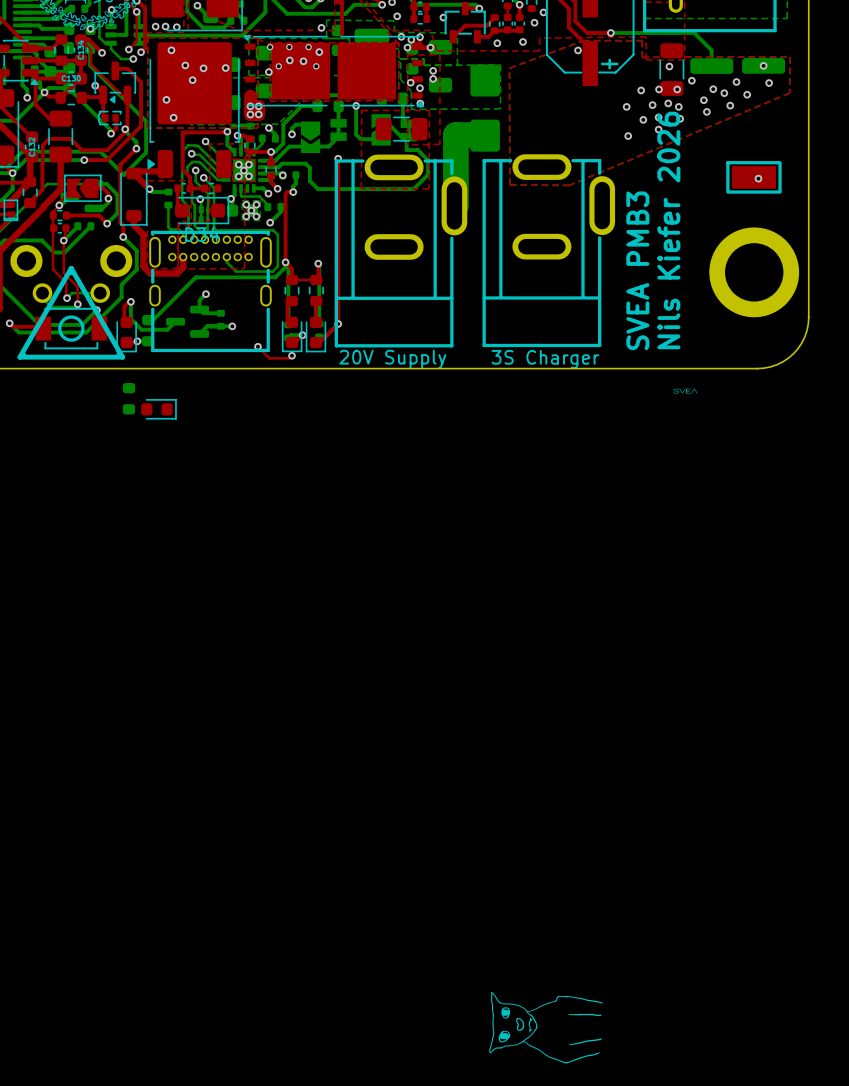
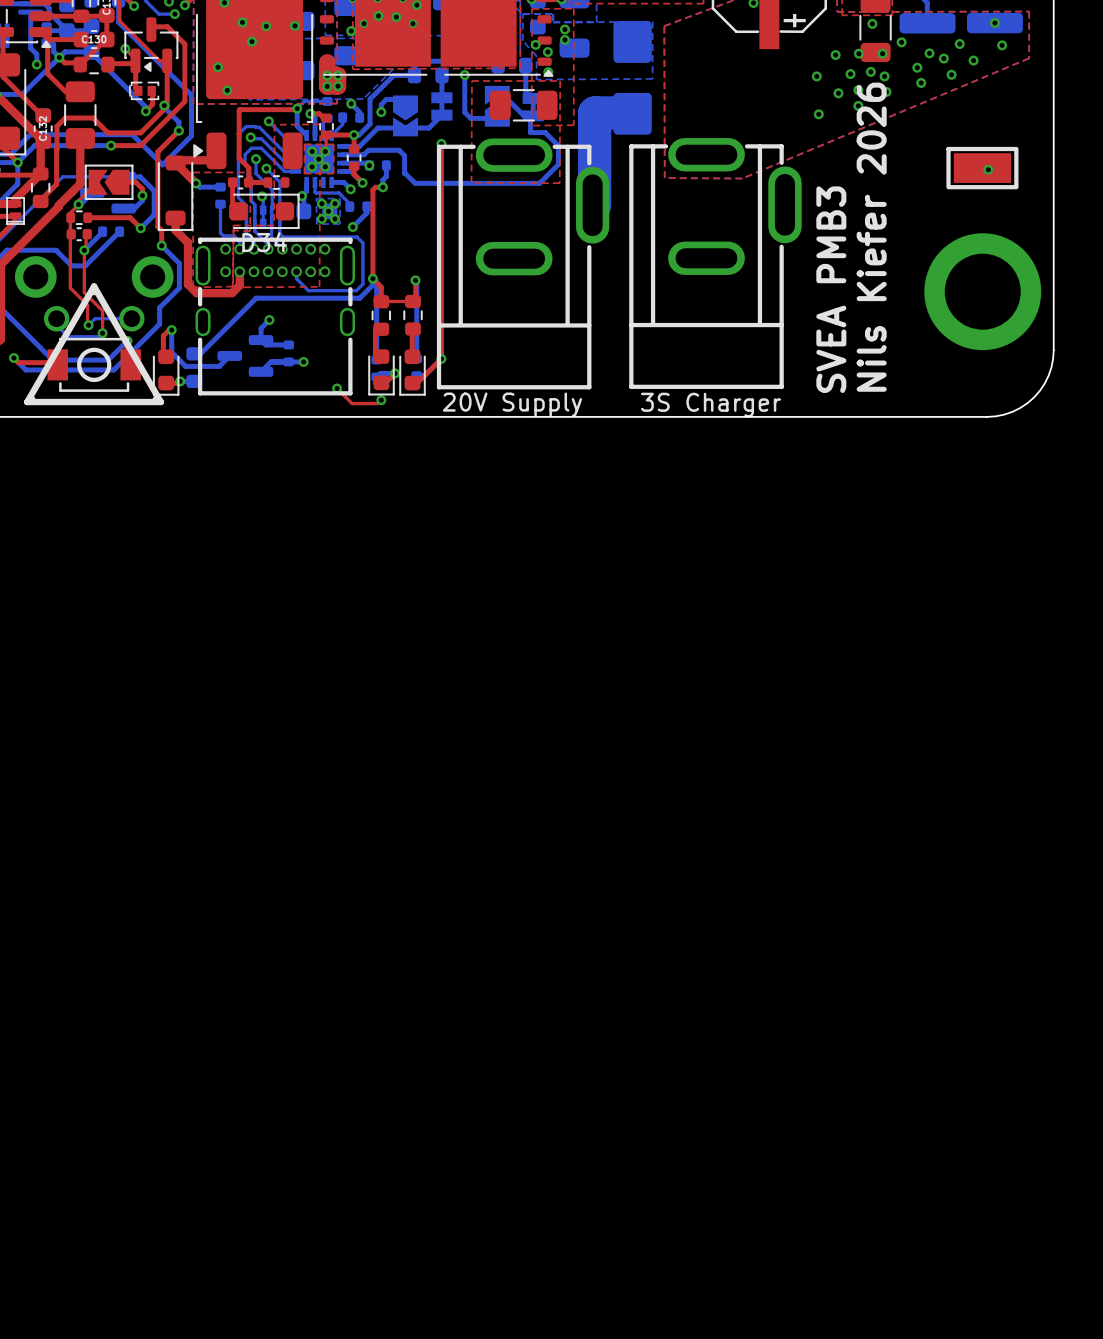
drawing: [673, 388, 698, 394] -> none
part: (129, 398) -> none
part: (158, 409) -> none
drawing: [489, 991, 604, 1064] -> none

